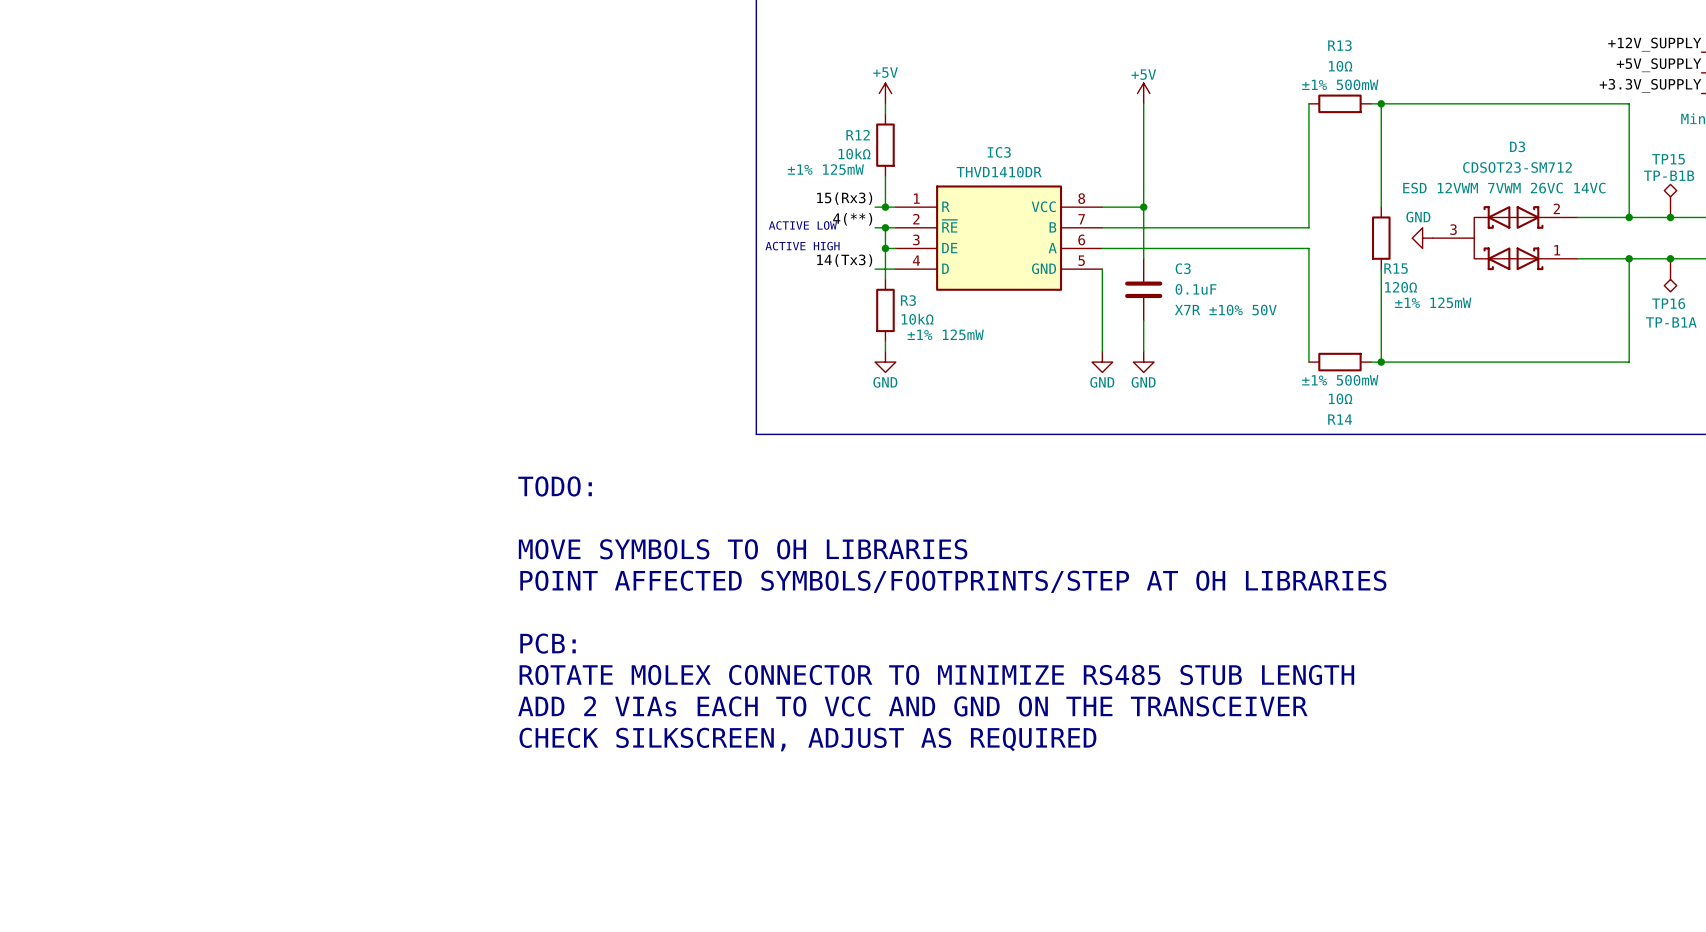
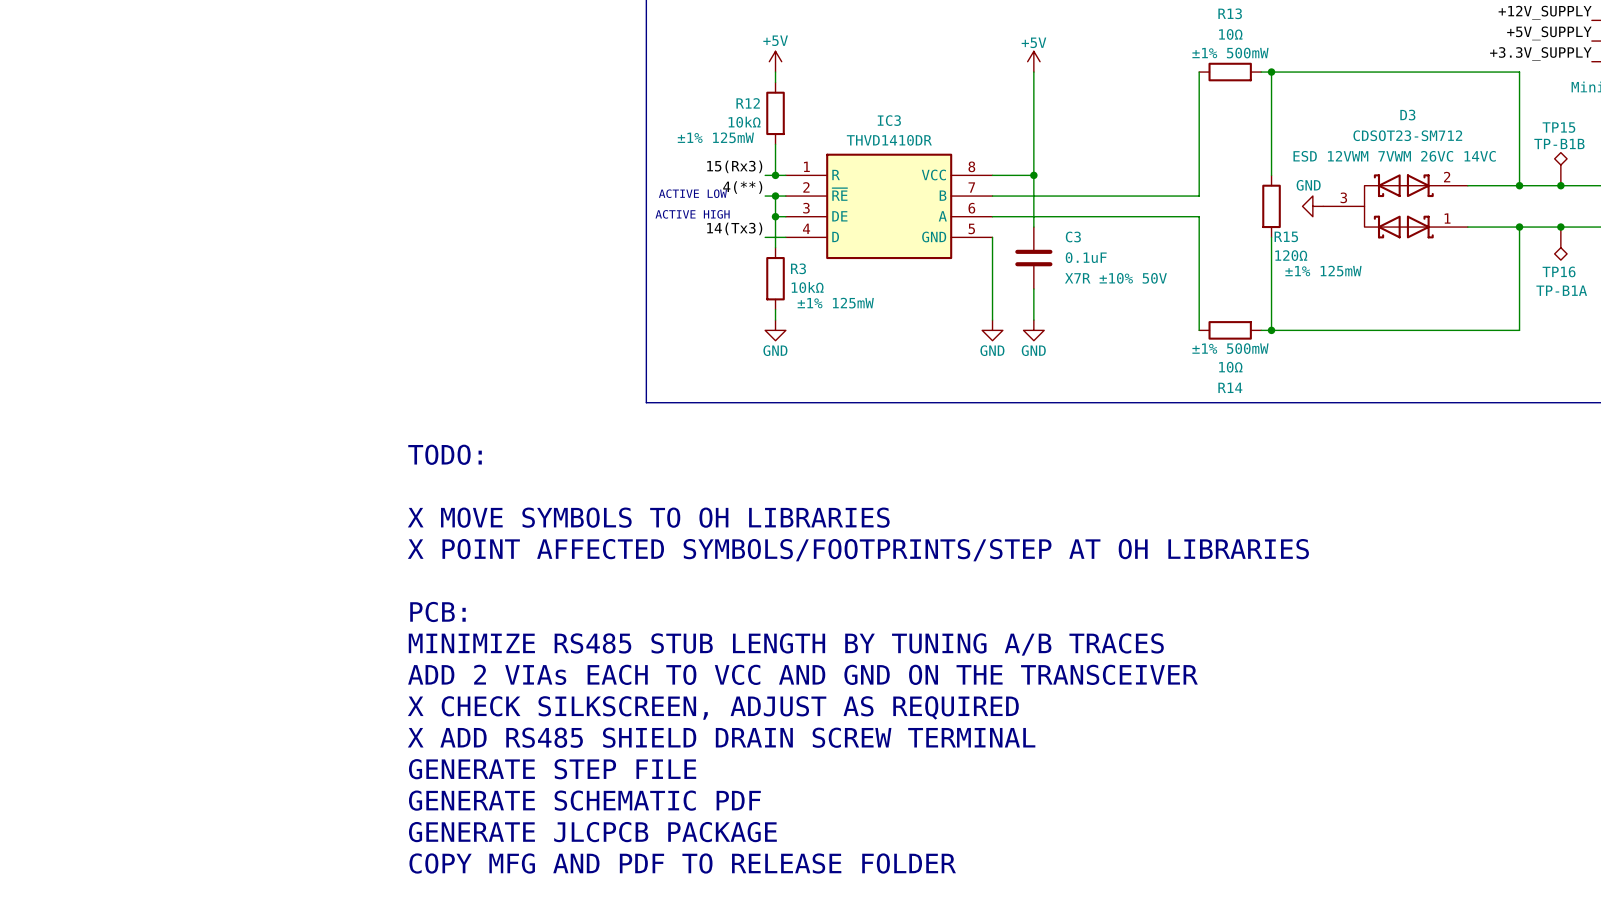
text: MOVE SYMBOLS TO OH LIBRARIES (743, 549) -> X MOVE SYMBOLS TO OH LIBRARIES (648, 517)
text: POINT AFFECTED SYMBOLS/FOOTPRINTS/STEP AT OH LIBRARIES (953, 581) -> X POINT AFFECTED SYMBOLS/FOOTPRINTS/STEP AT OH LIBRARIES (858, 550)
text: ROTATE MOLEX CONNECTOR TO MINIMIZE RS485 STUB LENGTH (936, 675) -> MINIMIZE RS485 STUB LENGTH BY TUNING A/B TRACES (786, 644)
text: CHECK SILKSCREEN, ADJUST AS REQUIRED (807, 739) -> X CHECK SILKSCREEN, ADJUST AS REQUIRED (713, 707)
text: none -> X ADD RS485 SHIELD DRAIN SCREW TERMINAL (721, 737)
text: none -> GENERATE STEP FILE (552, 769)
text: none -> GENERATE SCHEMATIC PDF (584, 800)
text: none -> GENERATE JLCPCB PACKAGE (592, 832)
text: none -> COPY MFG AND PDF TO RELEASE FOLDER (682, 863)

